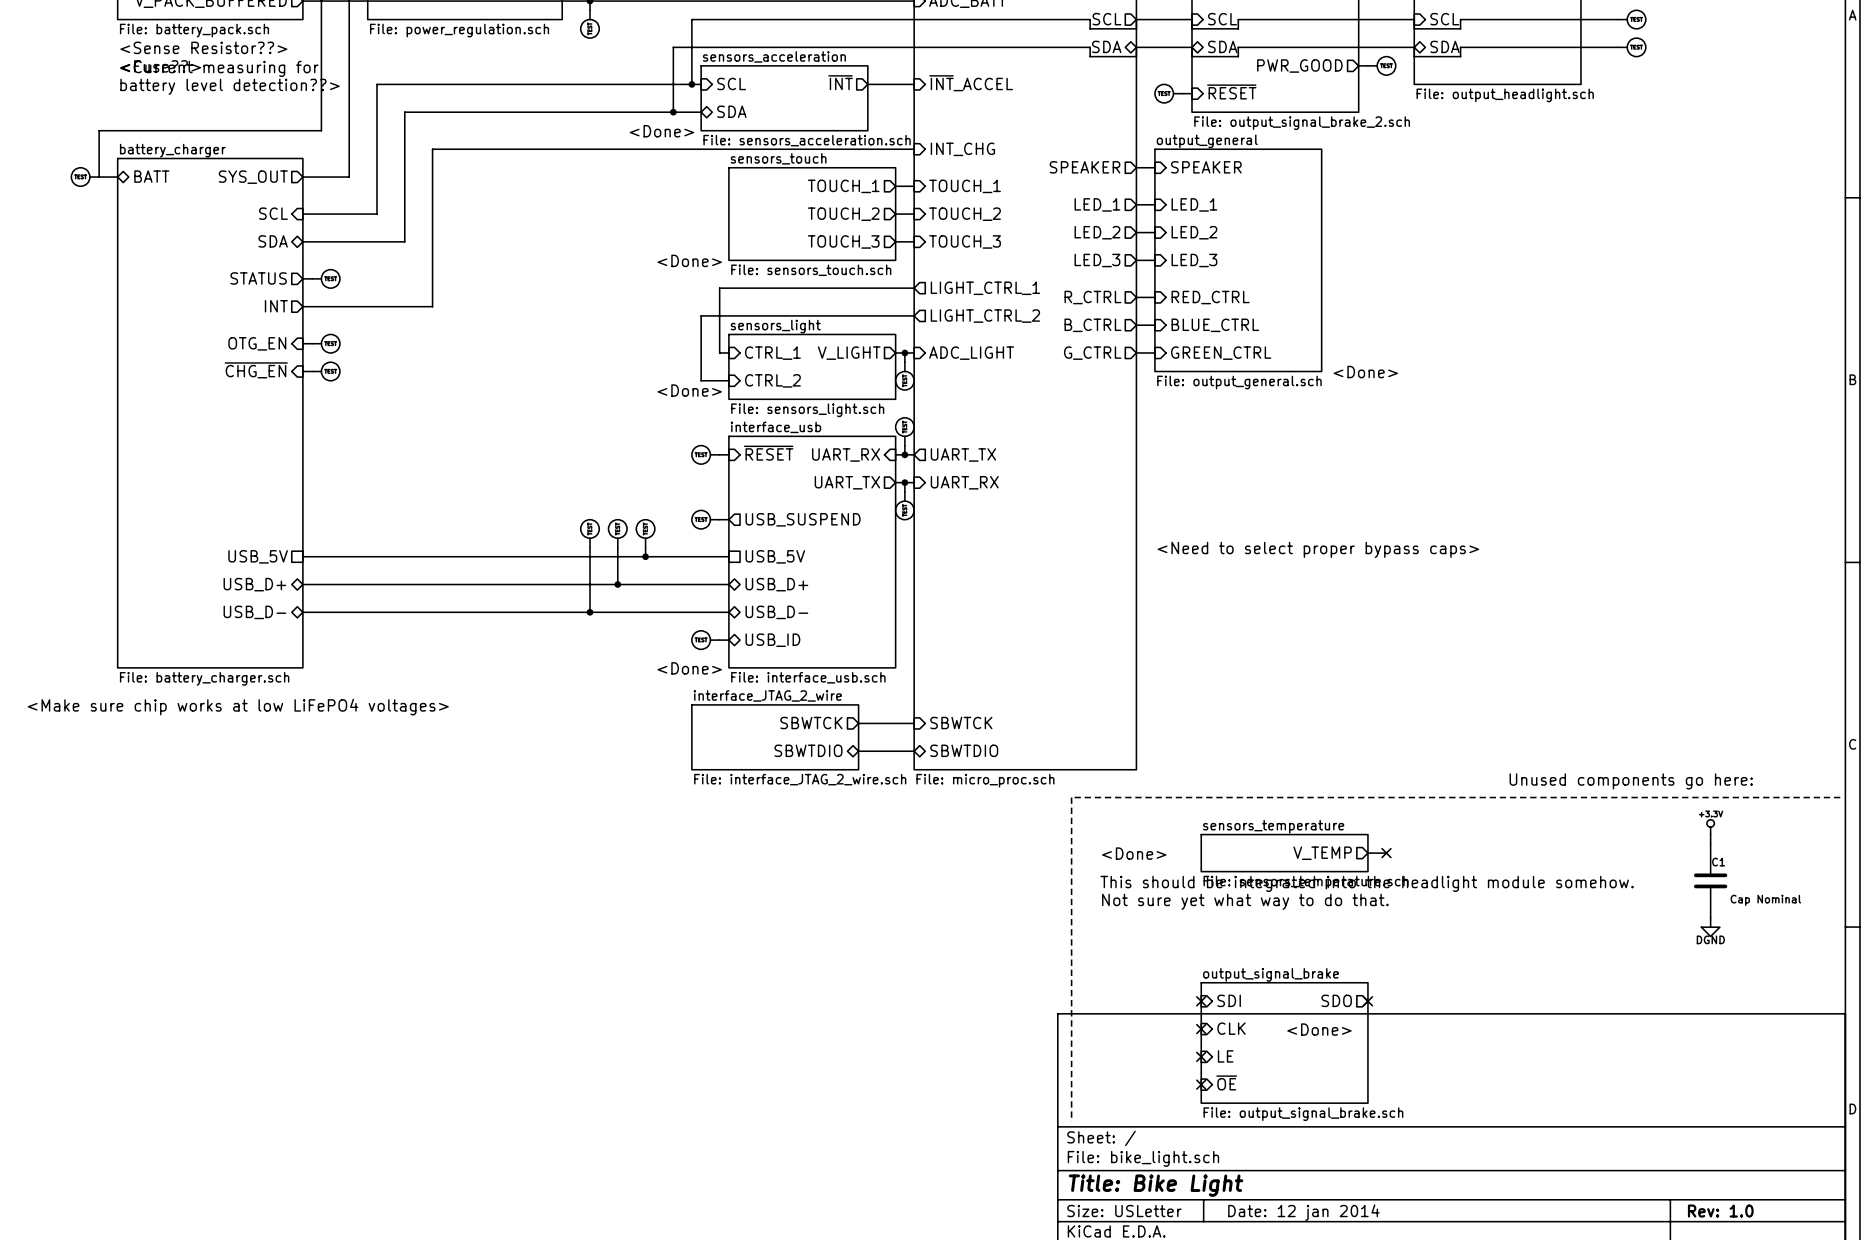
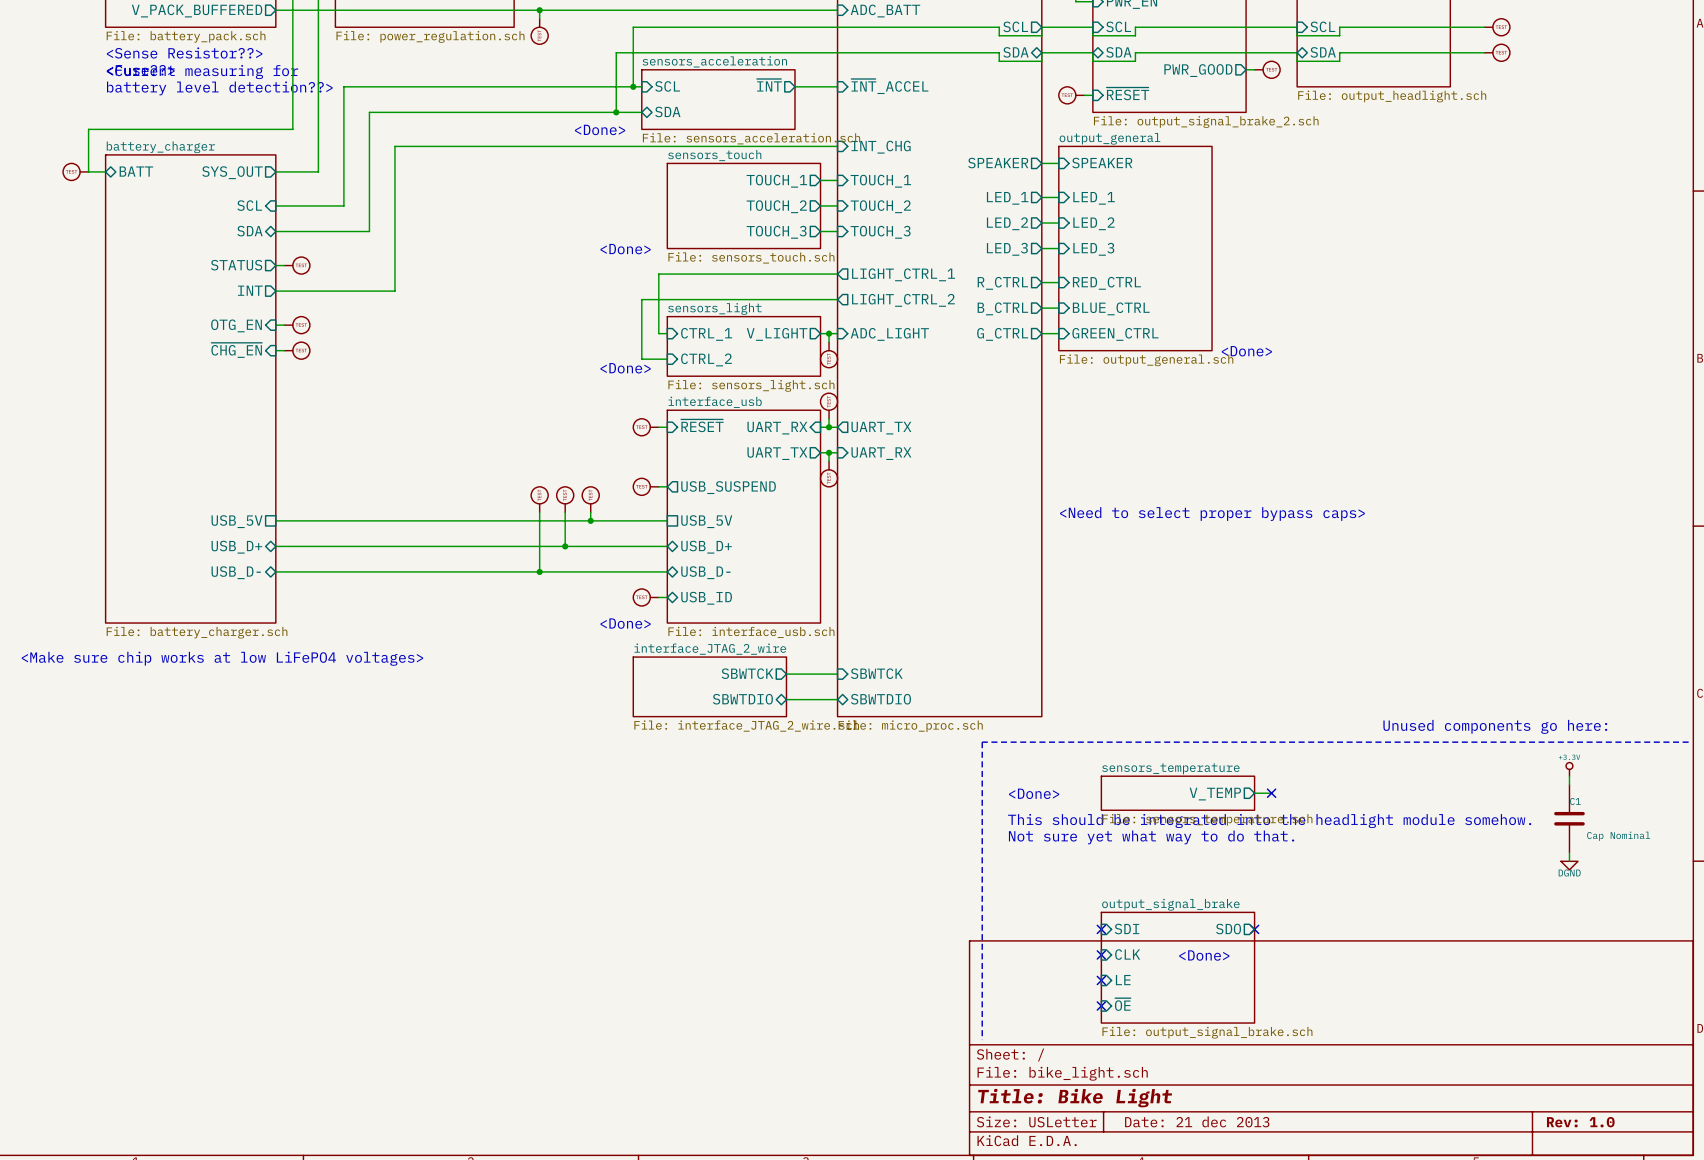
title block: Date: 12 jan 2014 (1303, 1212) -> Date: 21 dec 2013 (1197, 1121)

